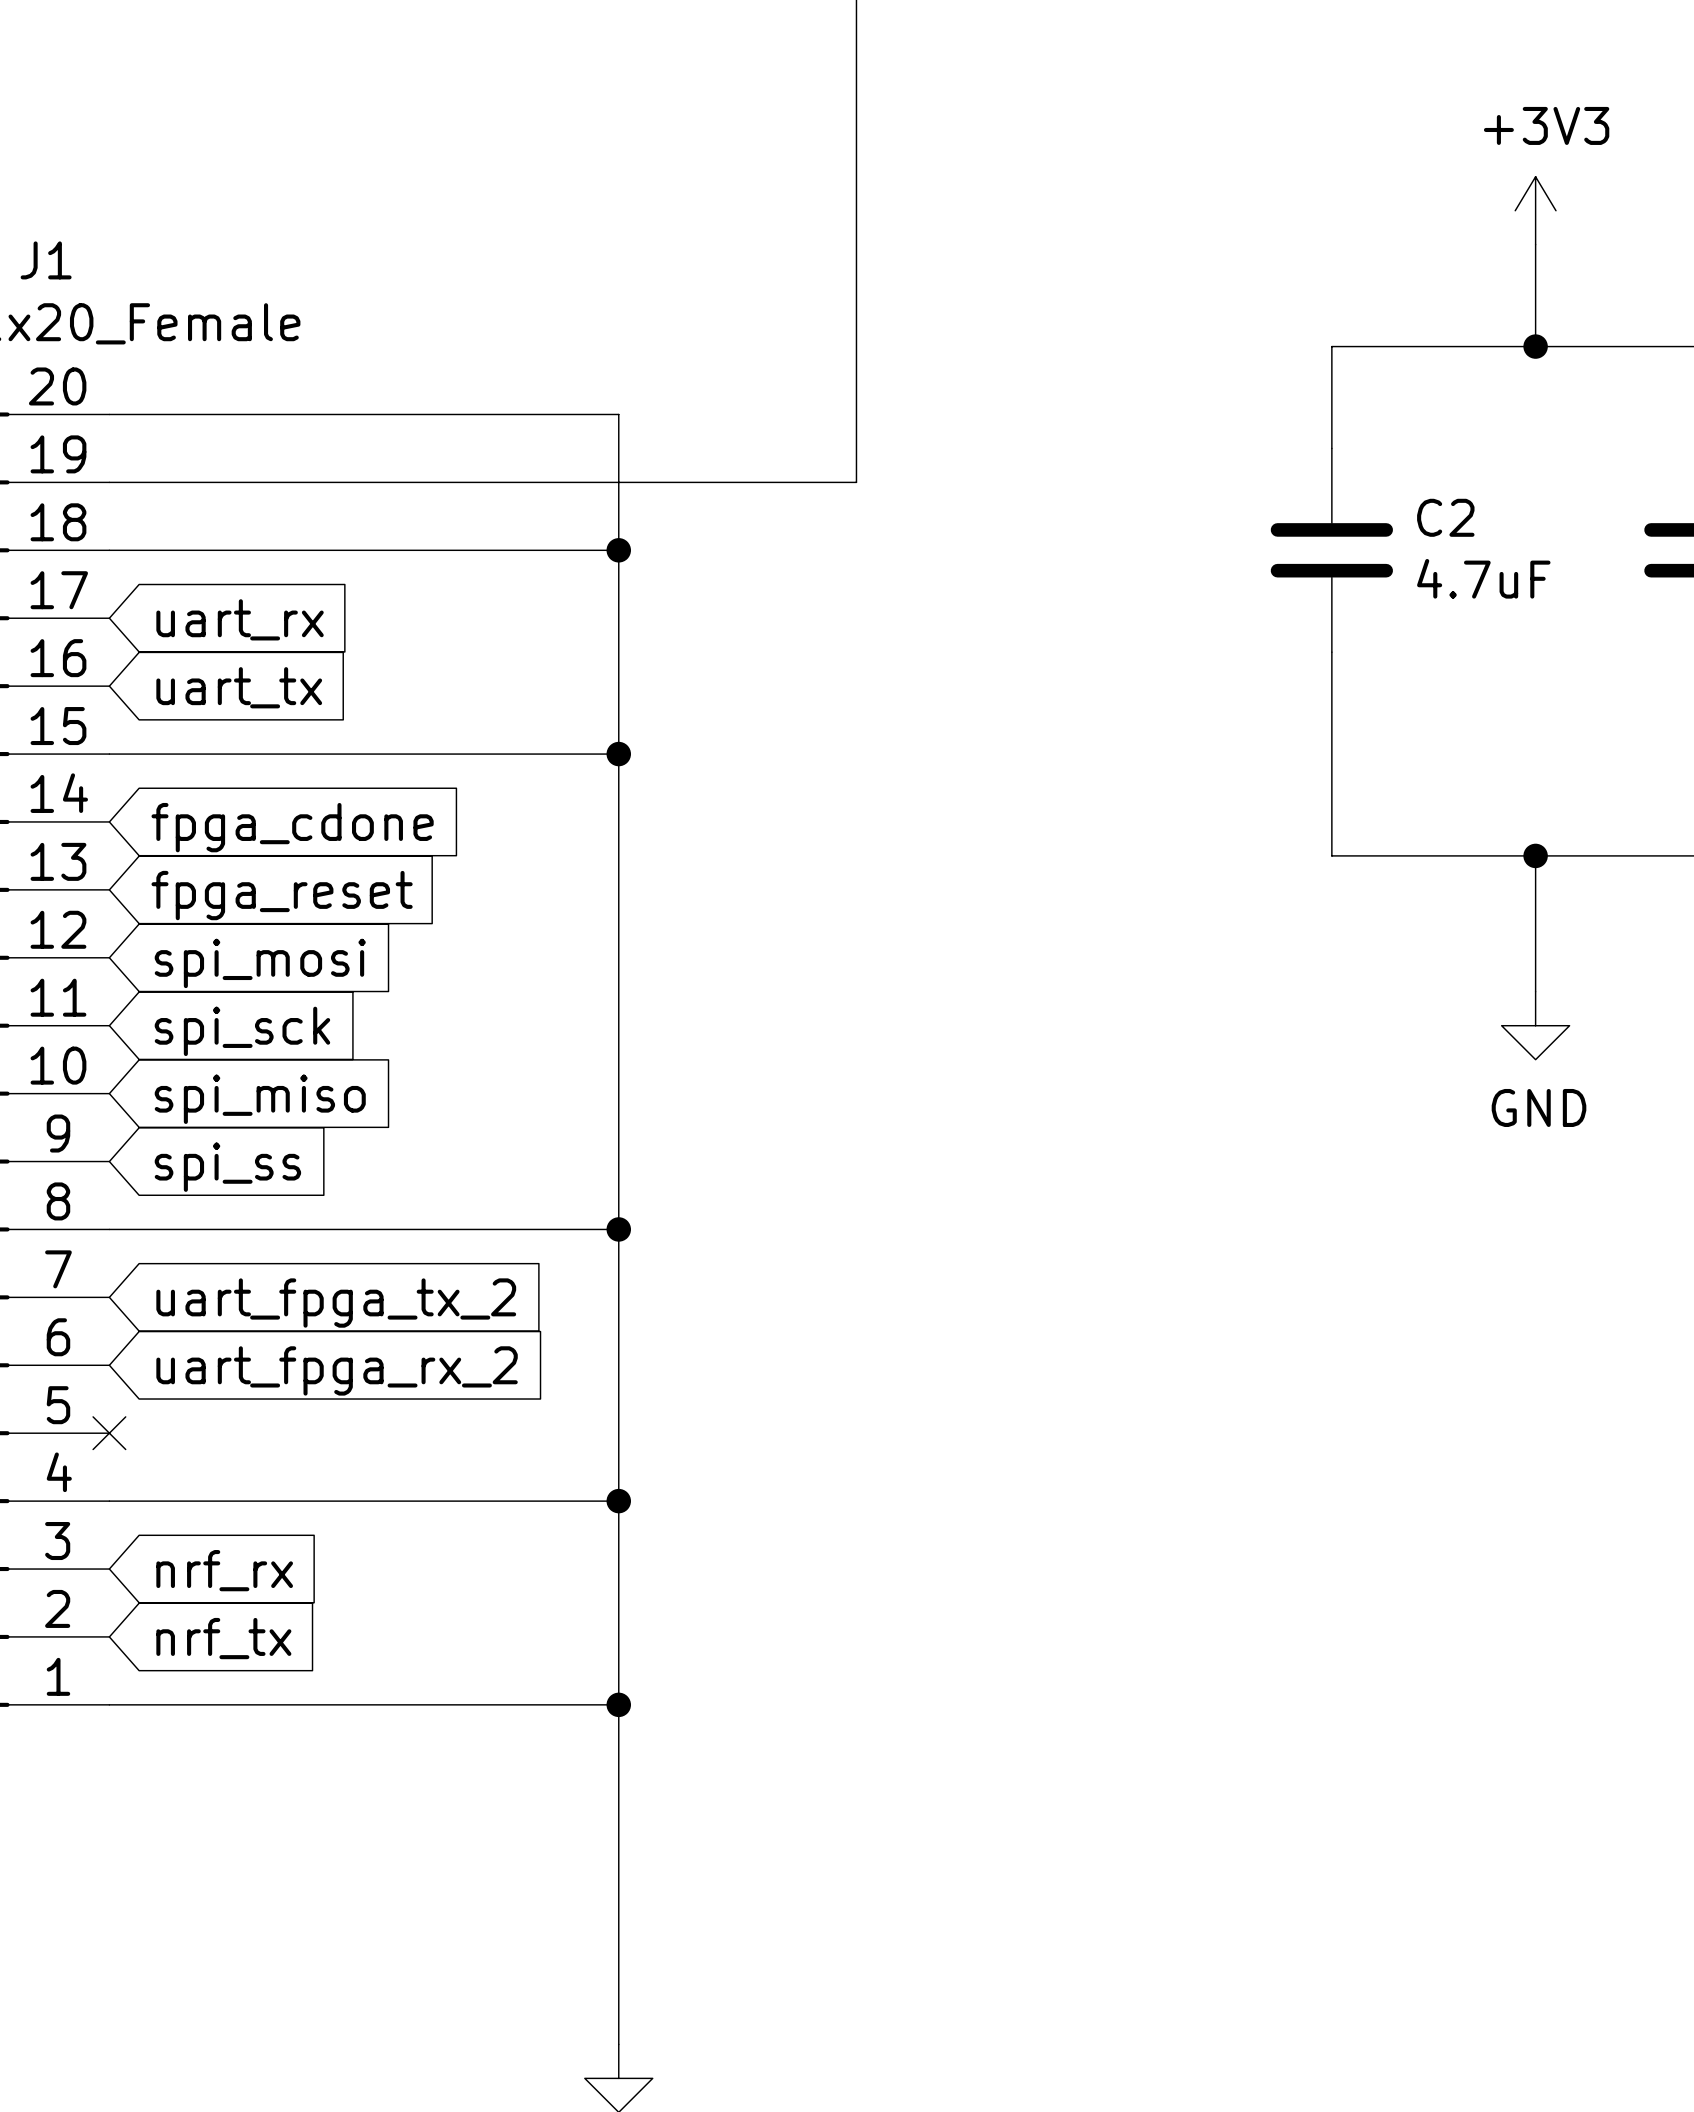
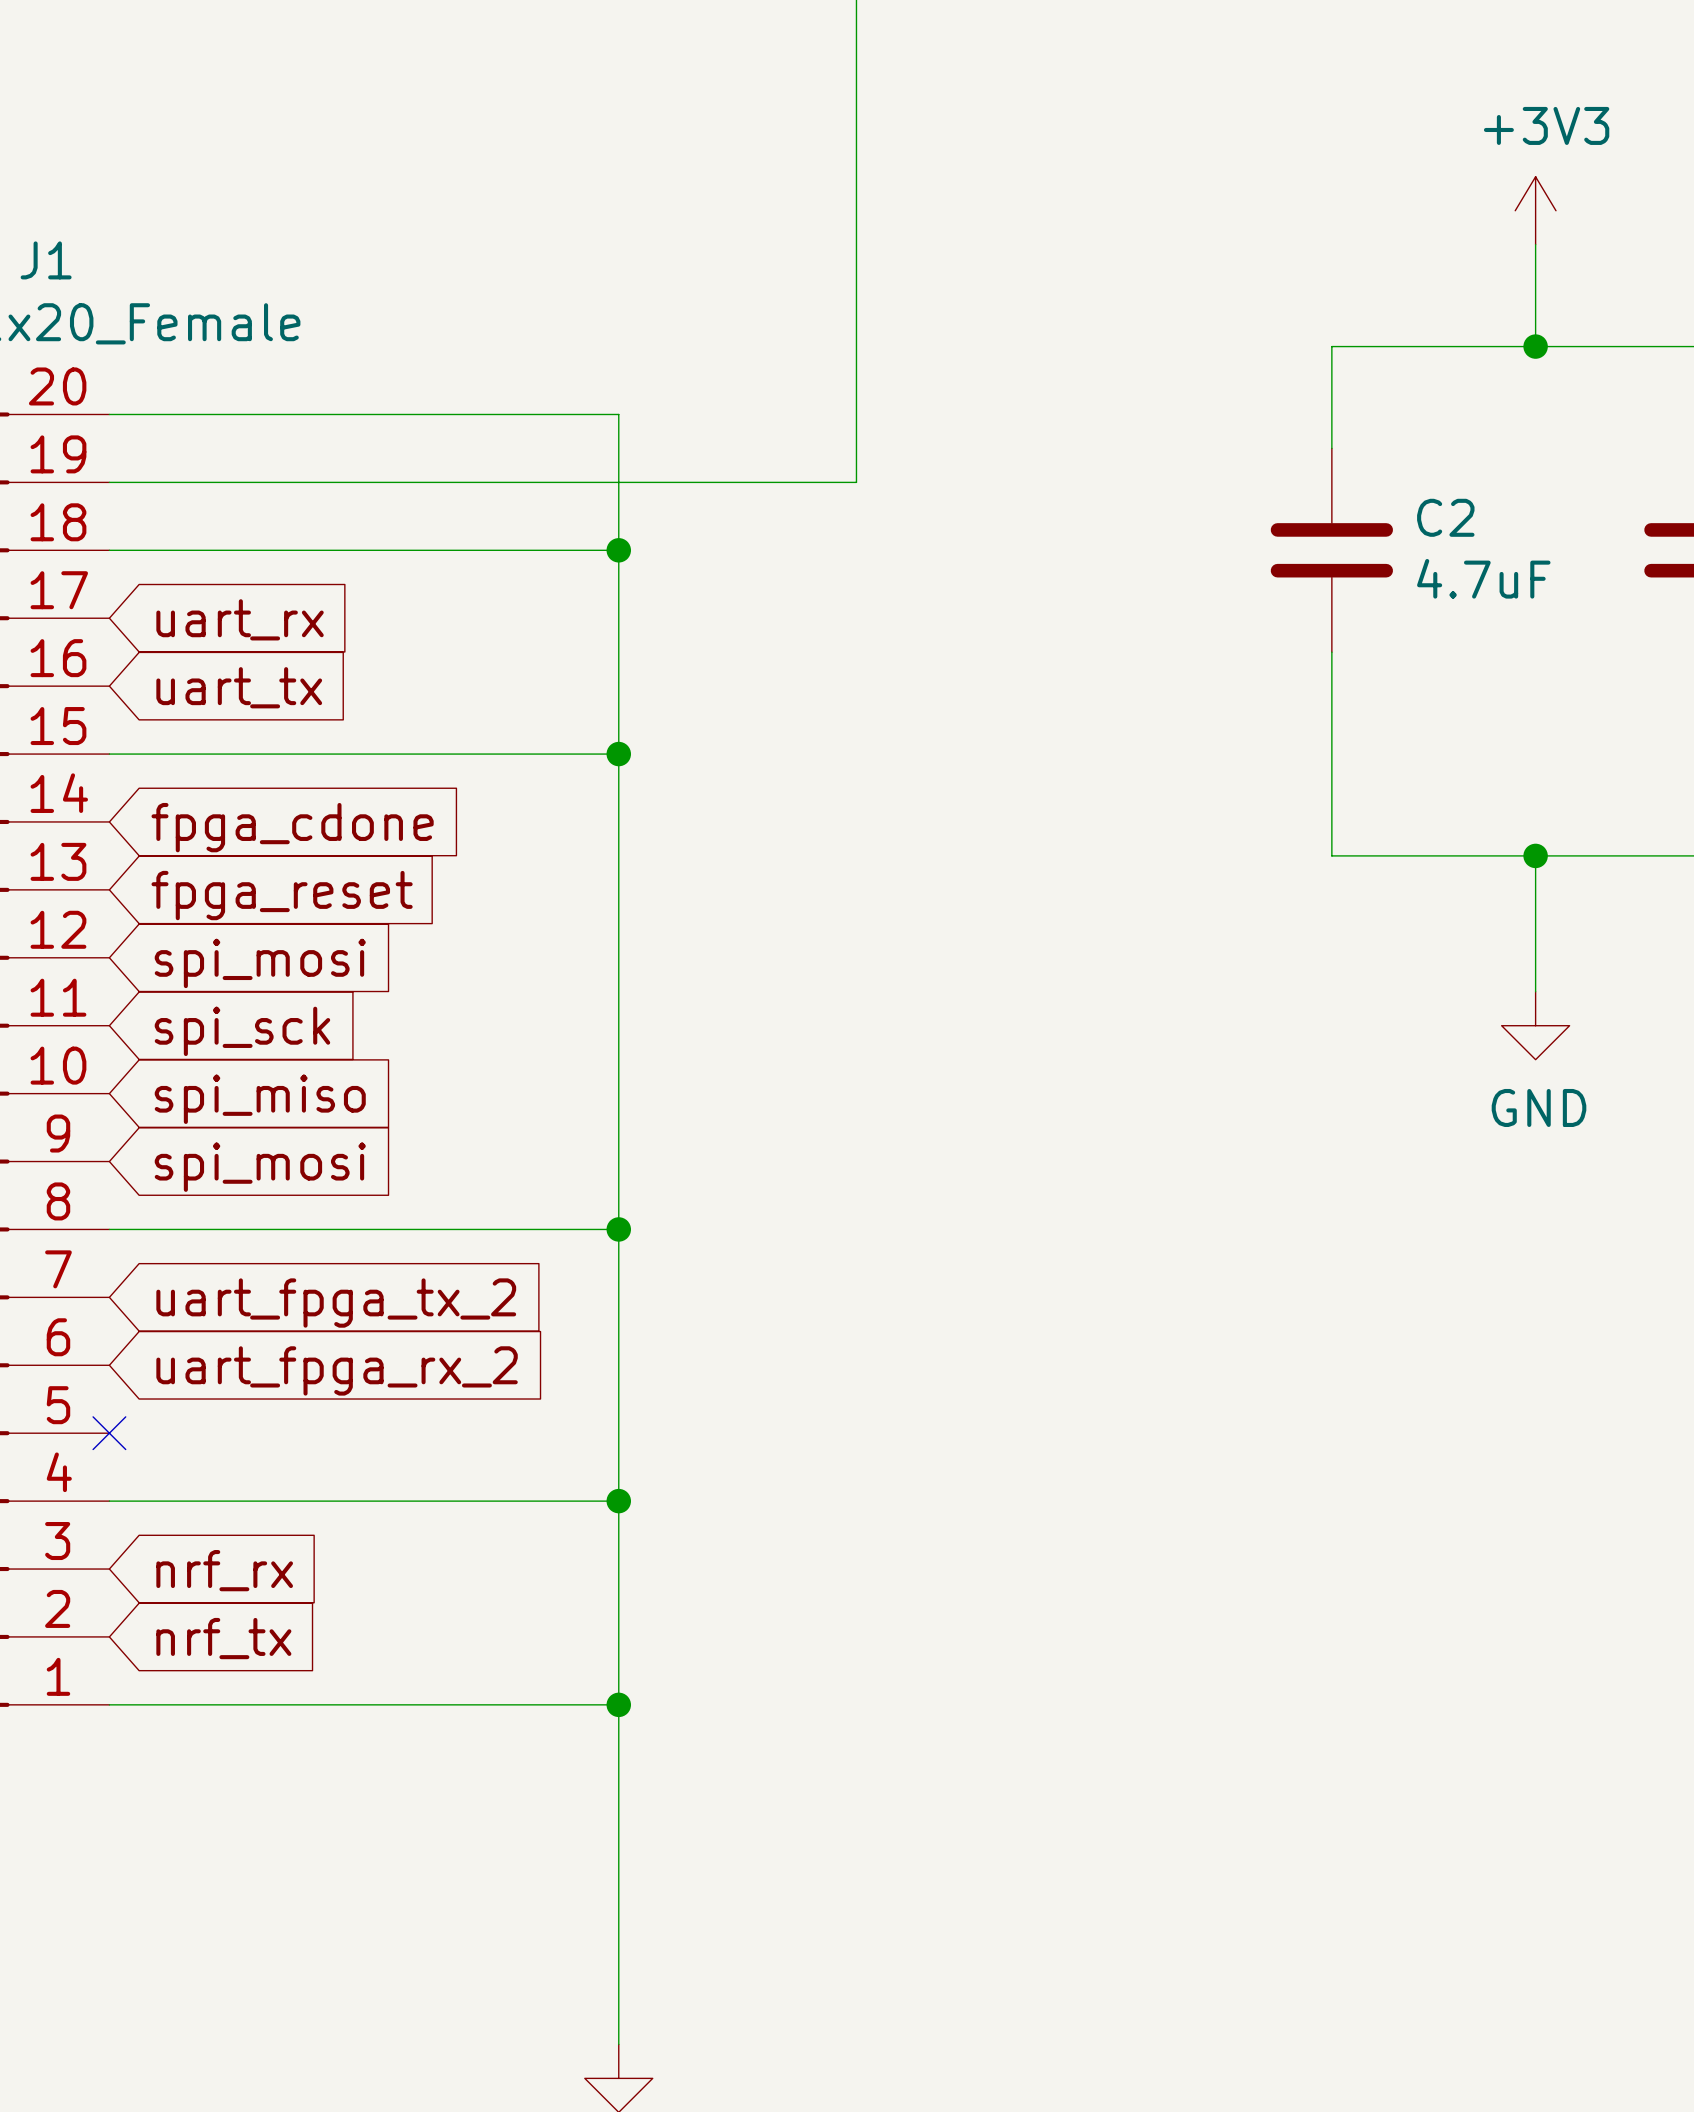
global label: spi_ss (227, 1167) -> spi_mosi (260, 1167)

